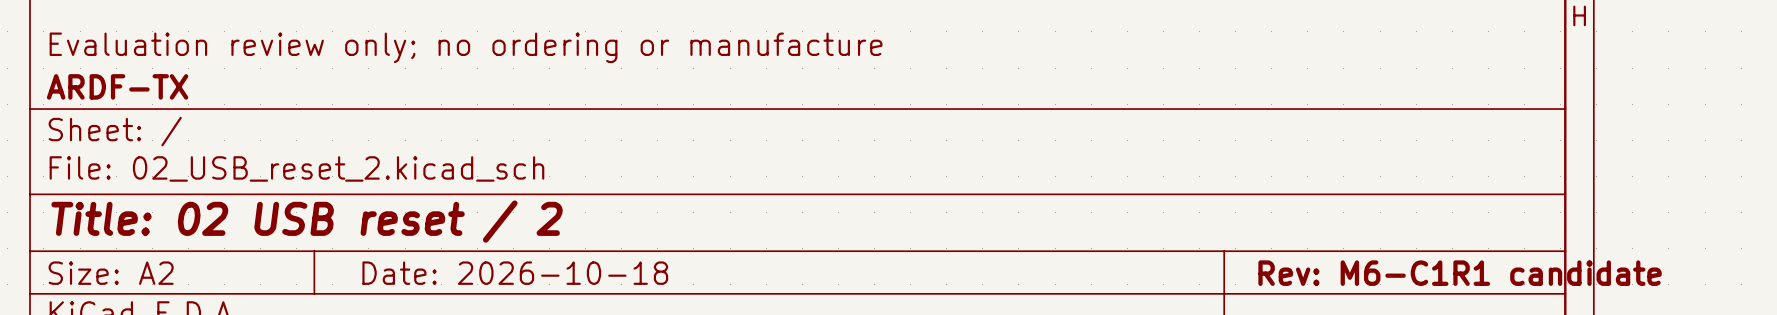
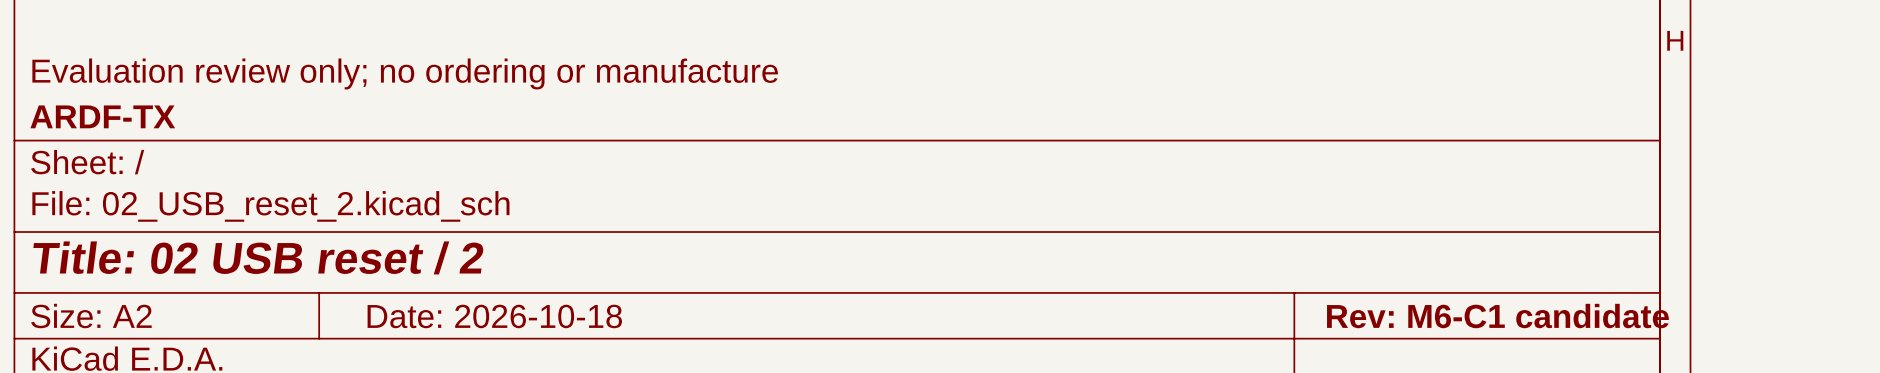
title block: Rev: M6-C1R1 candidate (1460, 273) -> Rev: M6-C1 candidate (1497, 316)

